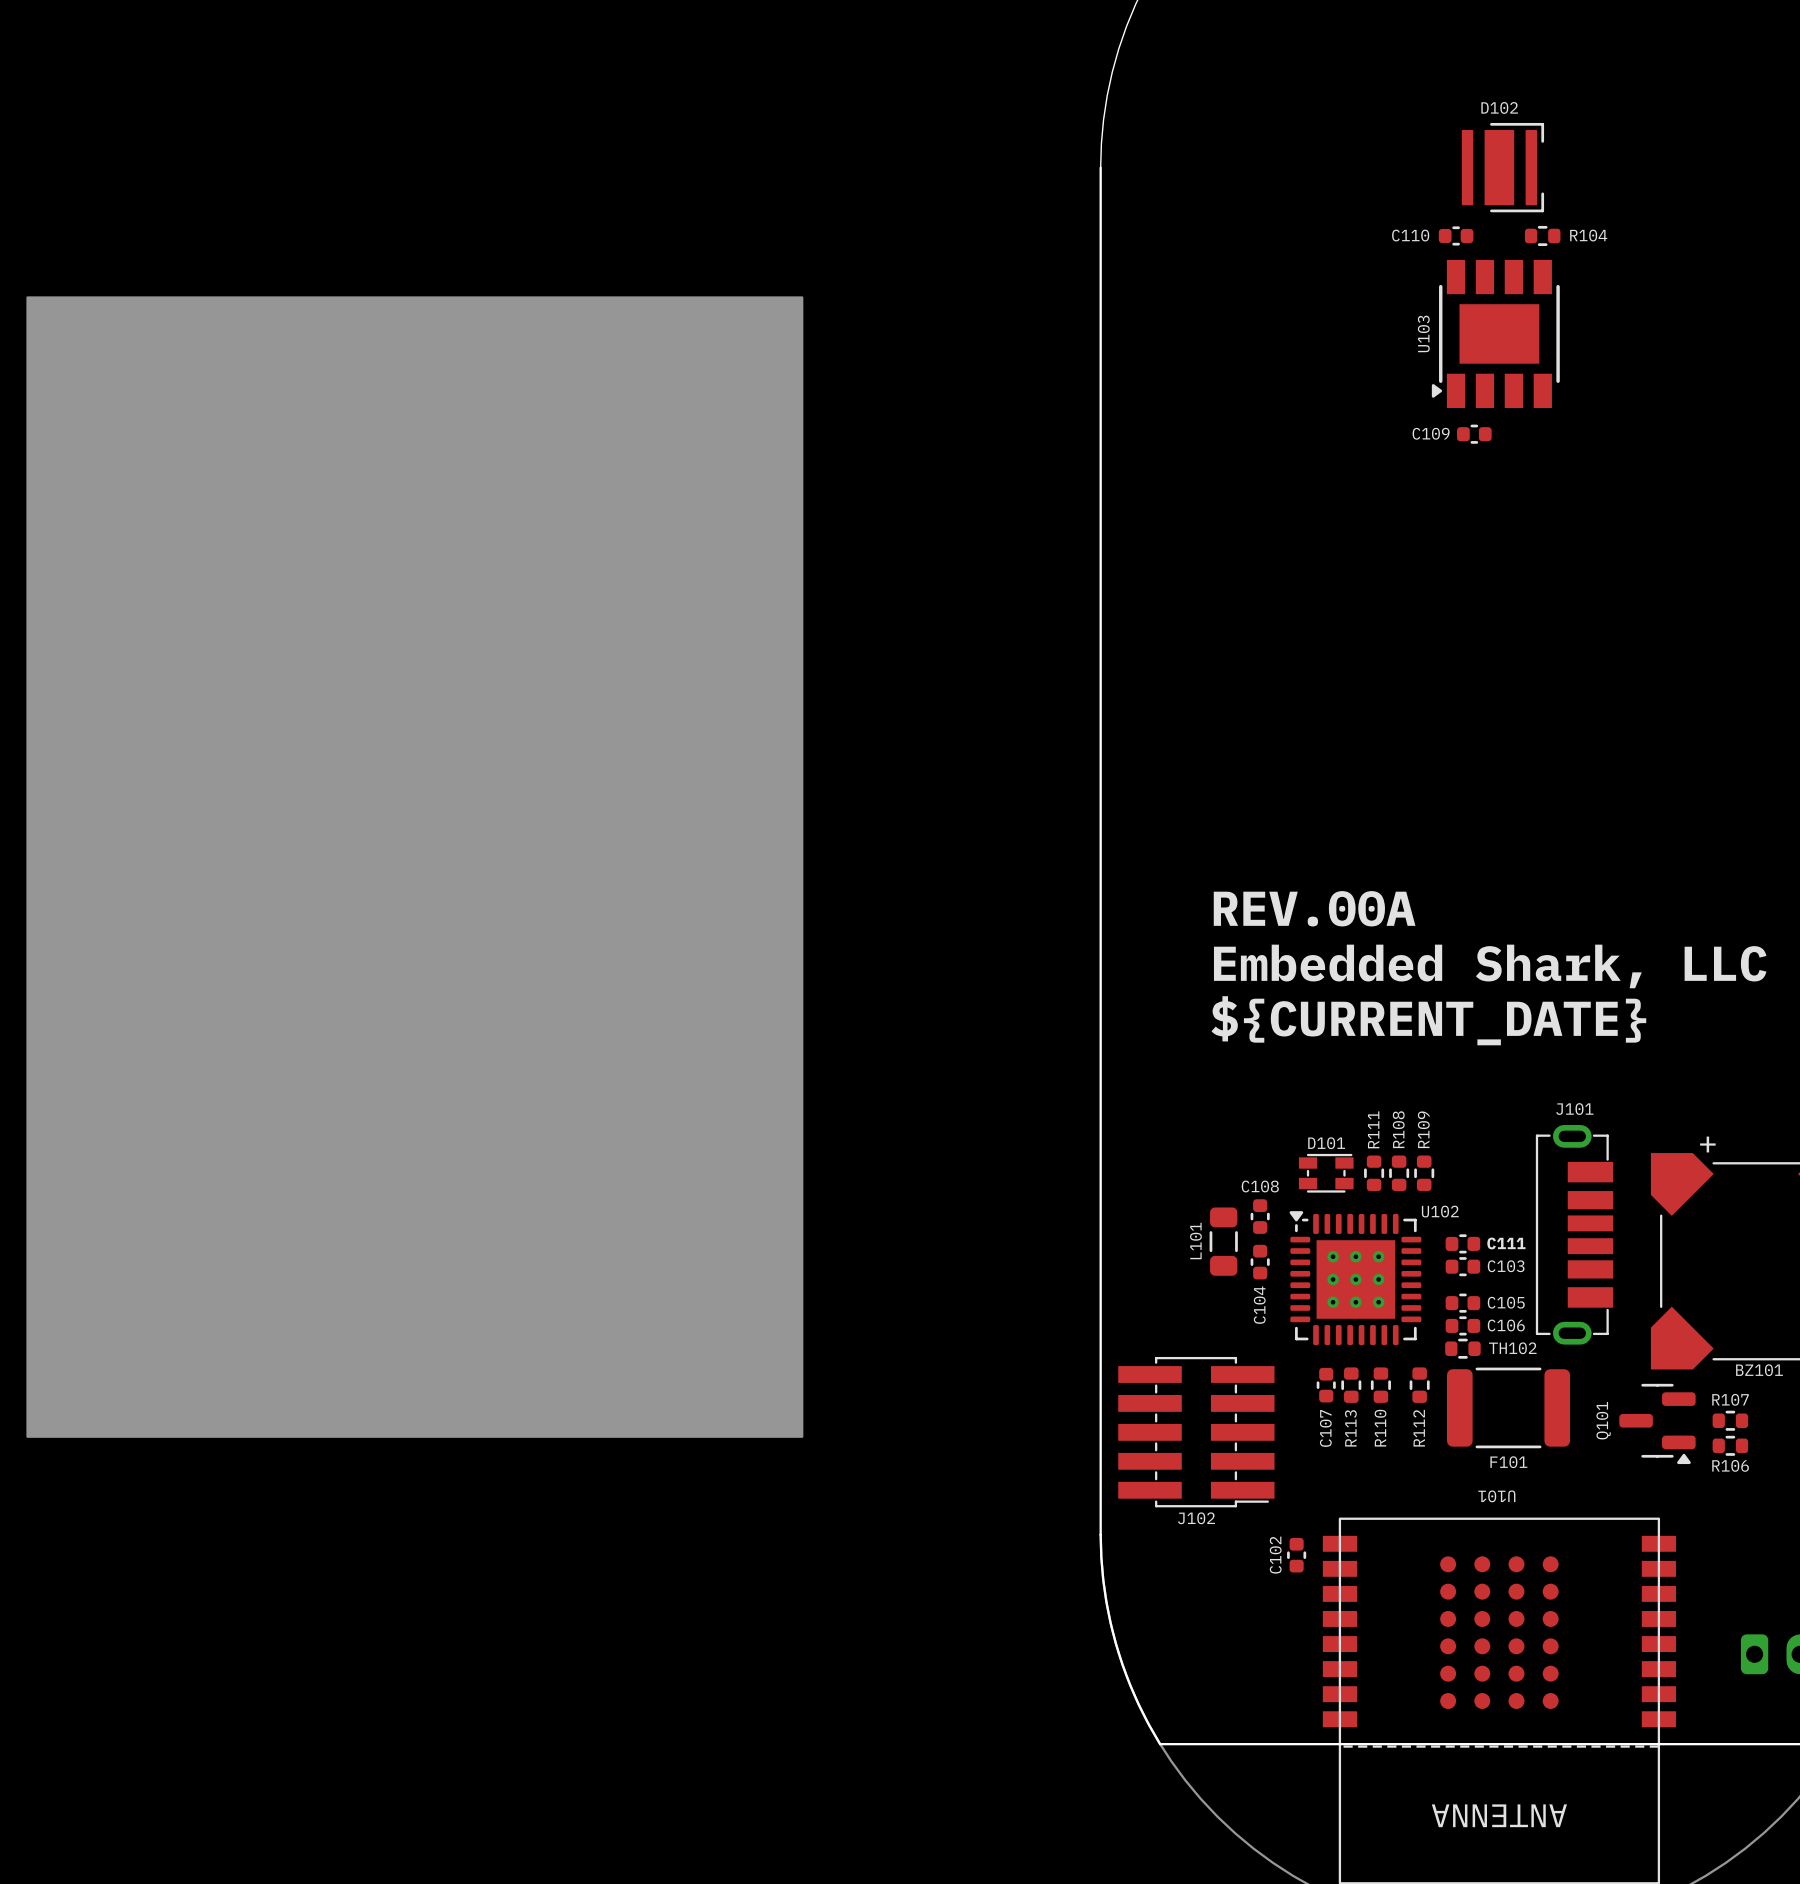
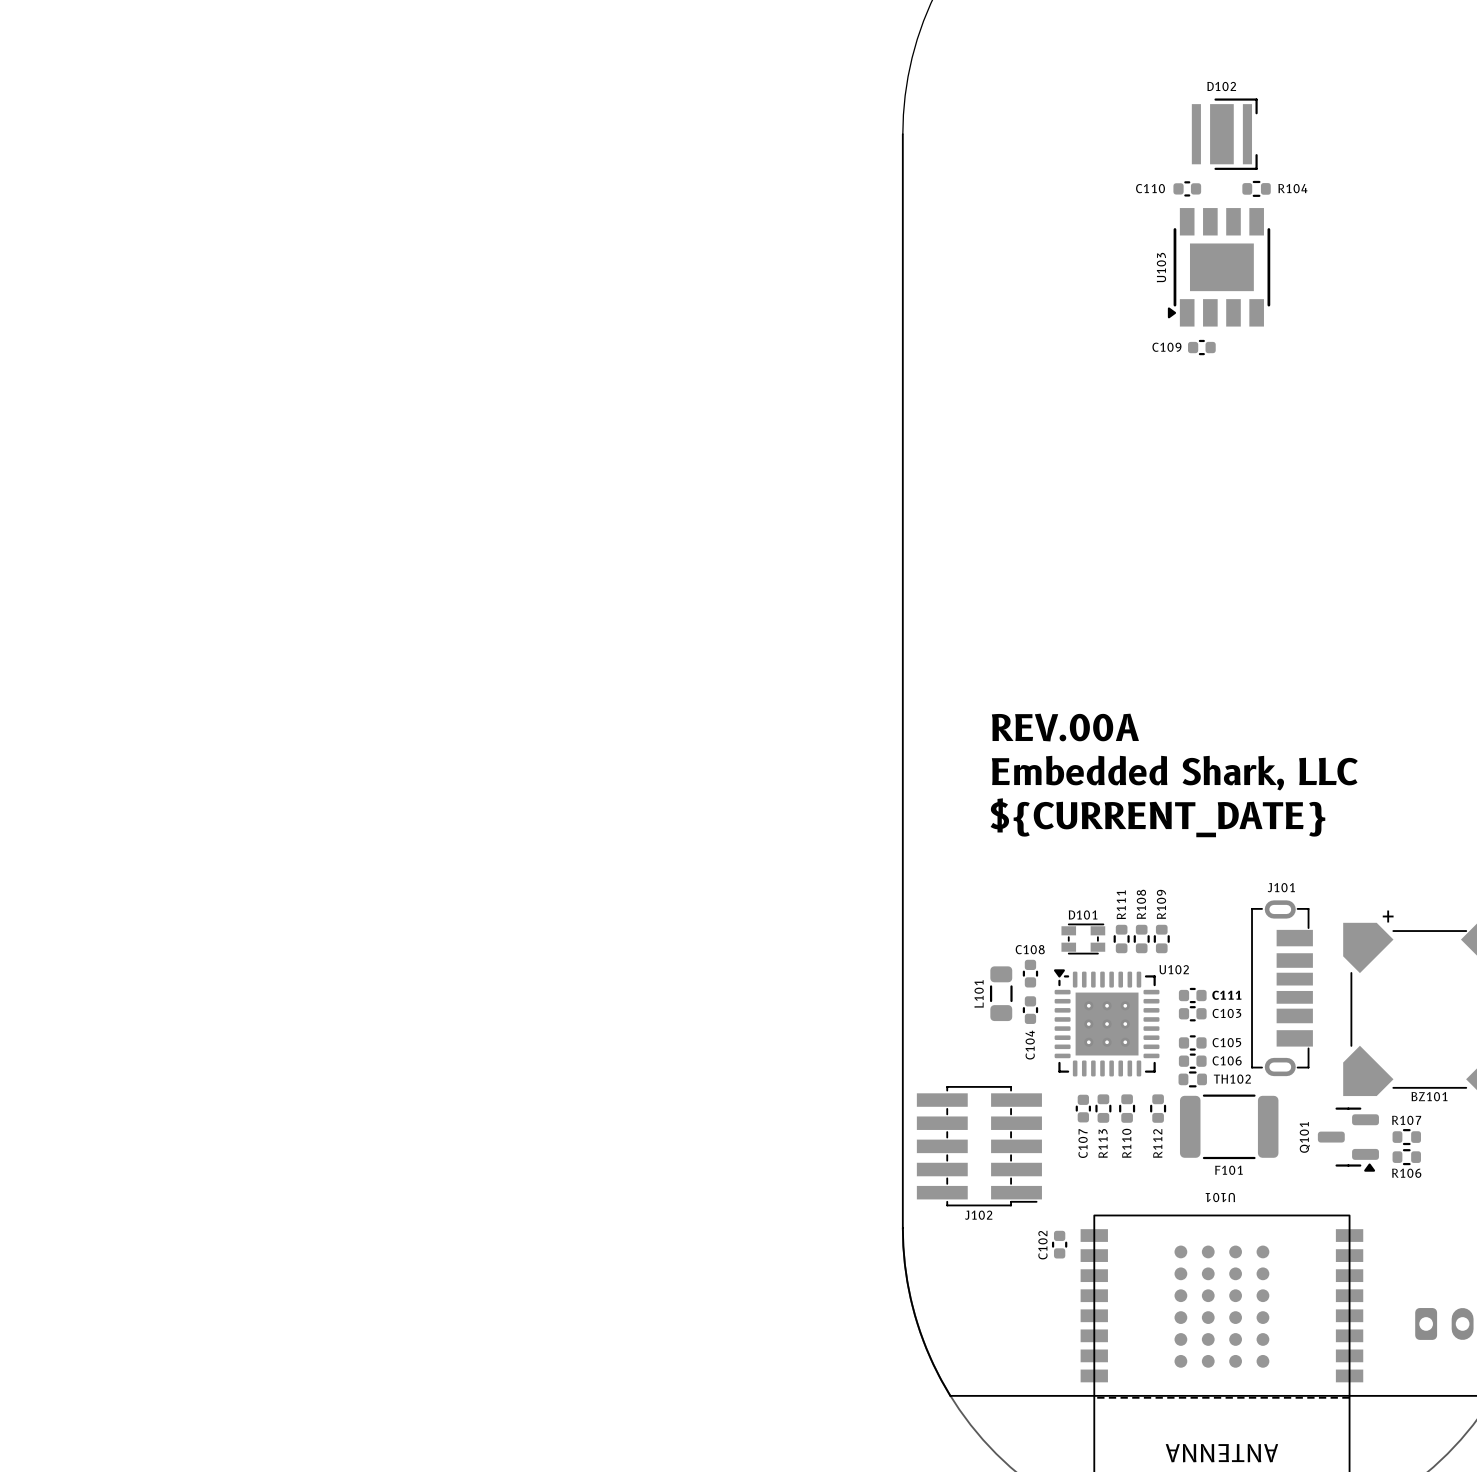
drawing: [26, 296, 804, 1438] -> none

